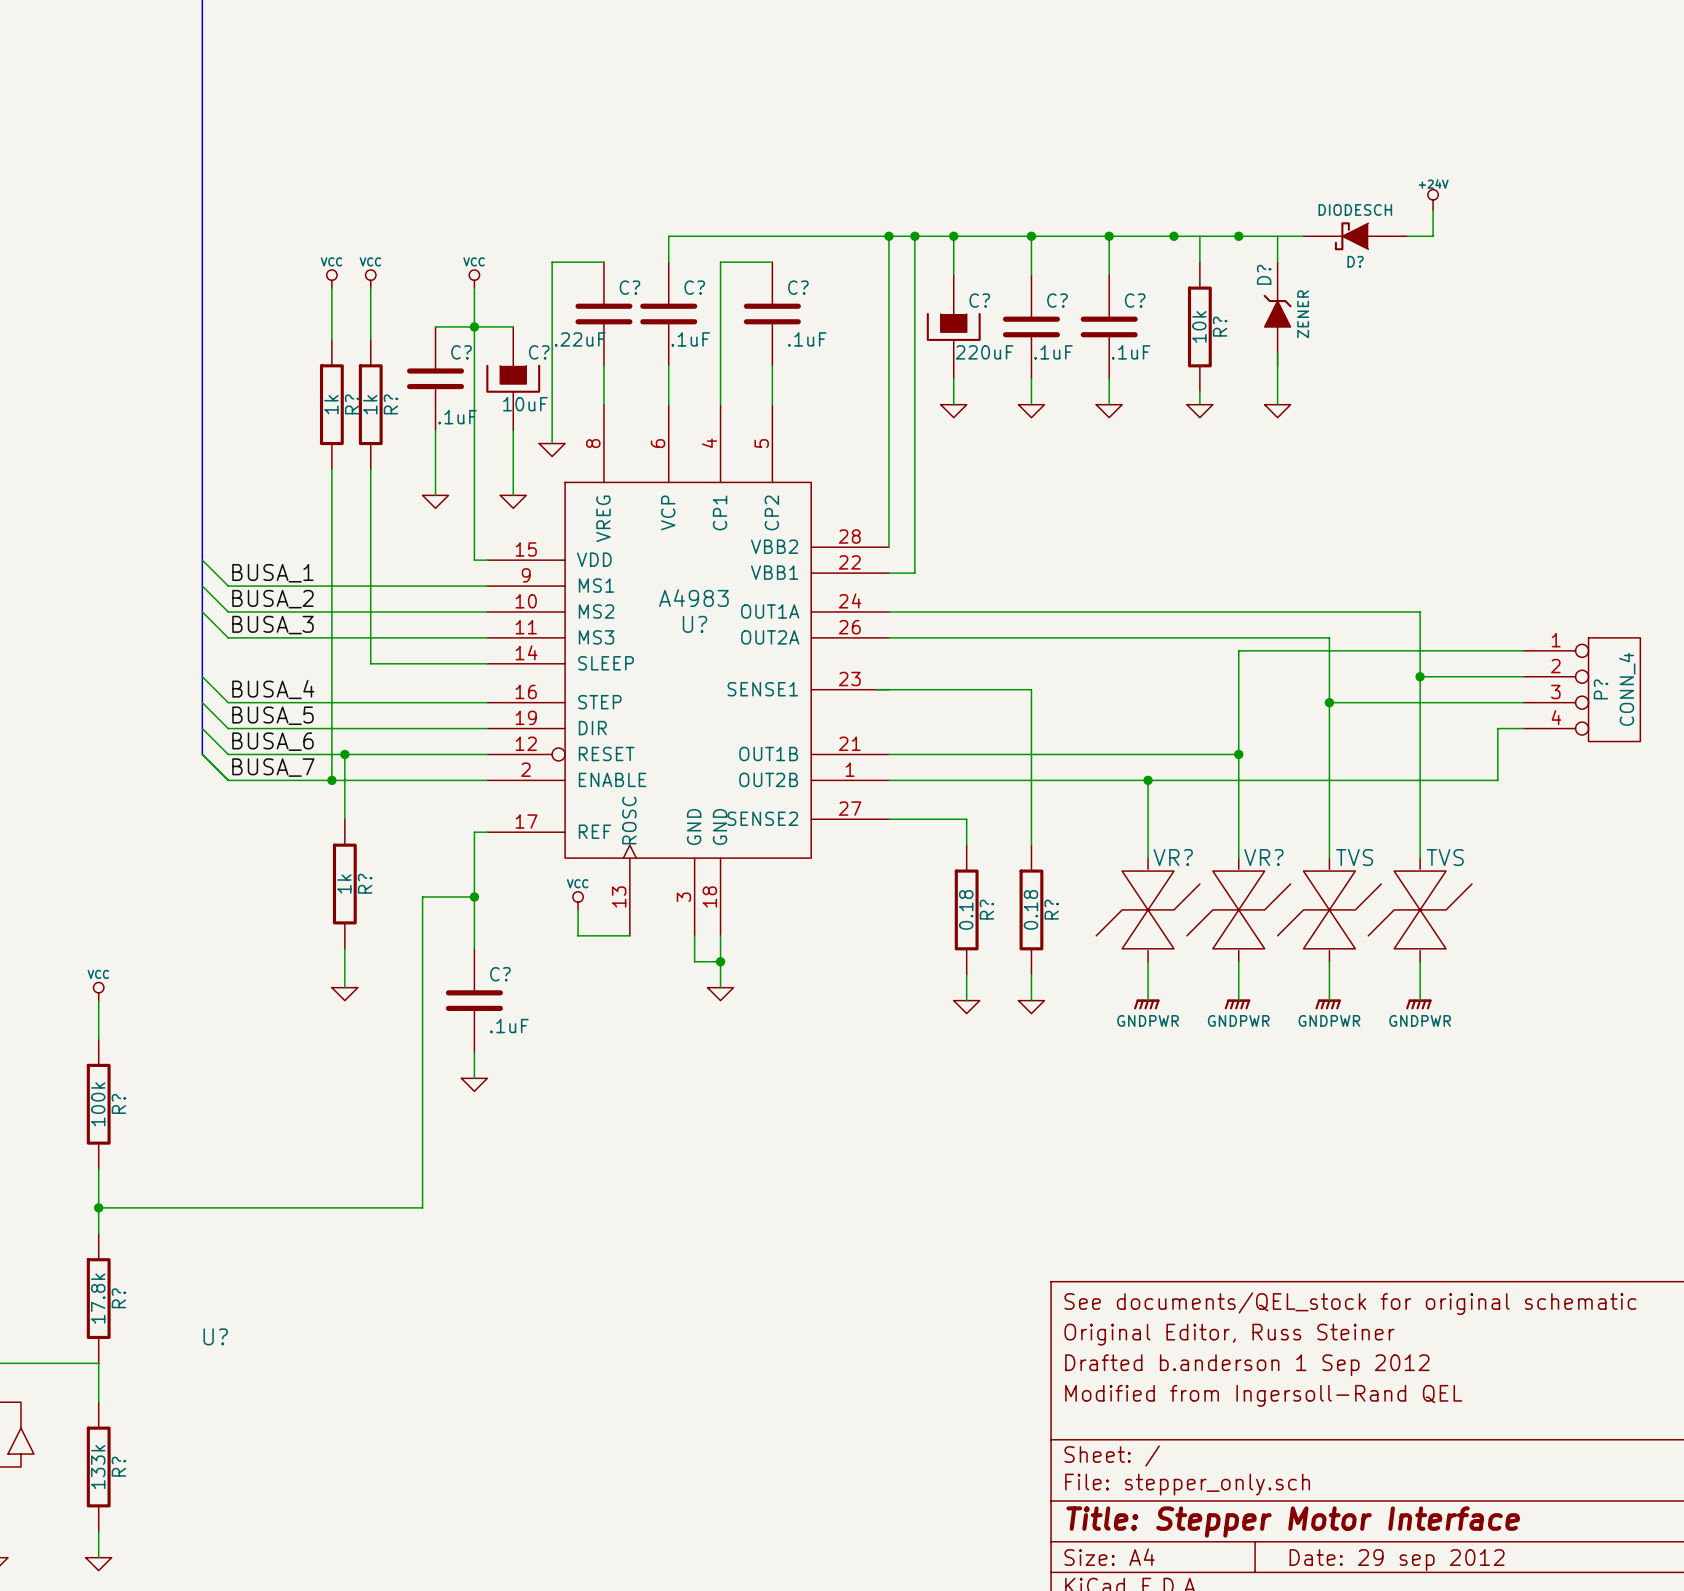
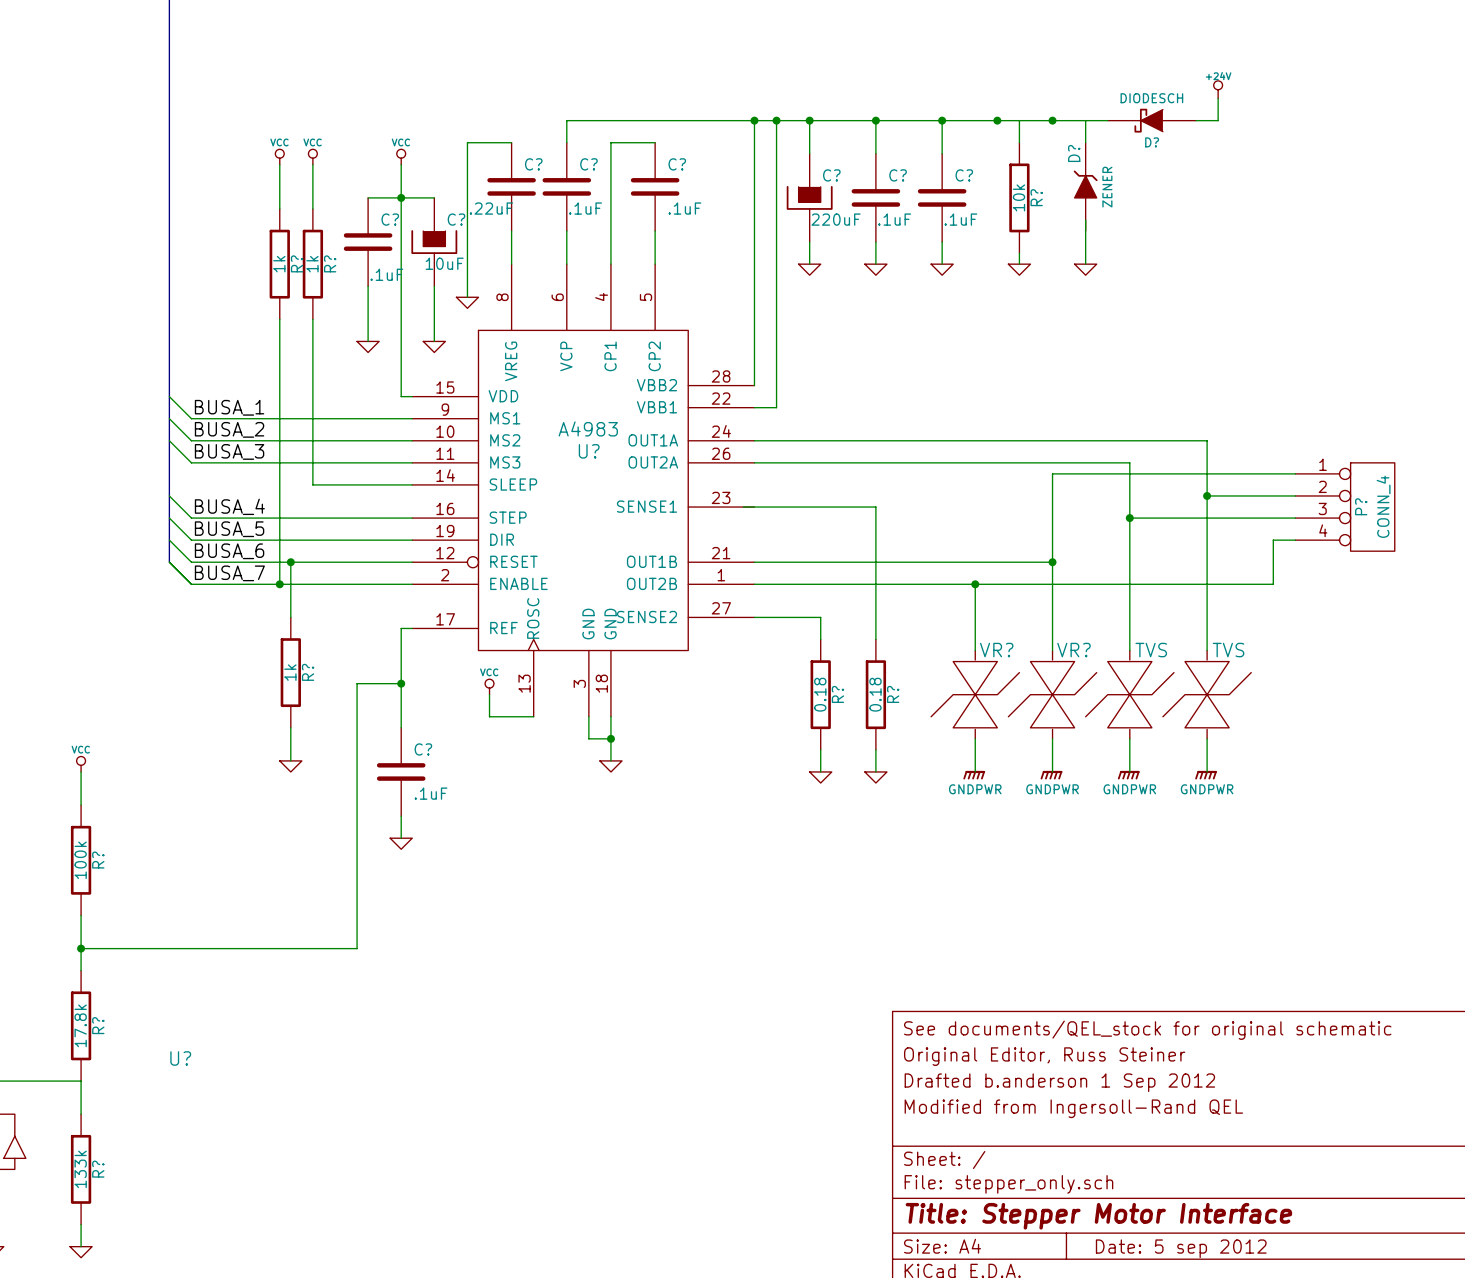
title block: Date: 29 sep 2012 (1397, 1560) -> Date: 5 sep 2012 (1181, 1248)

